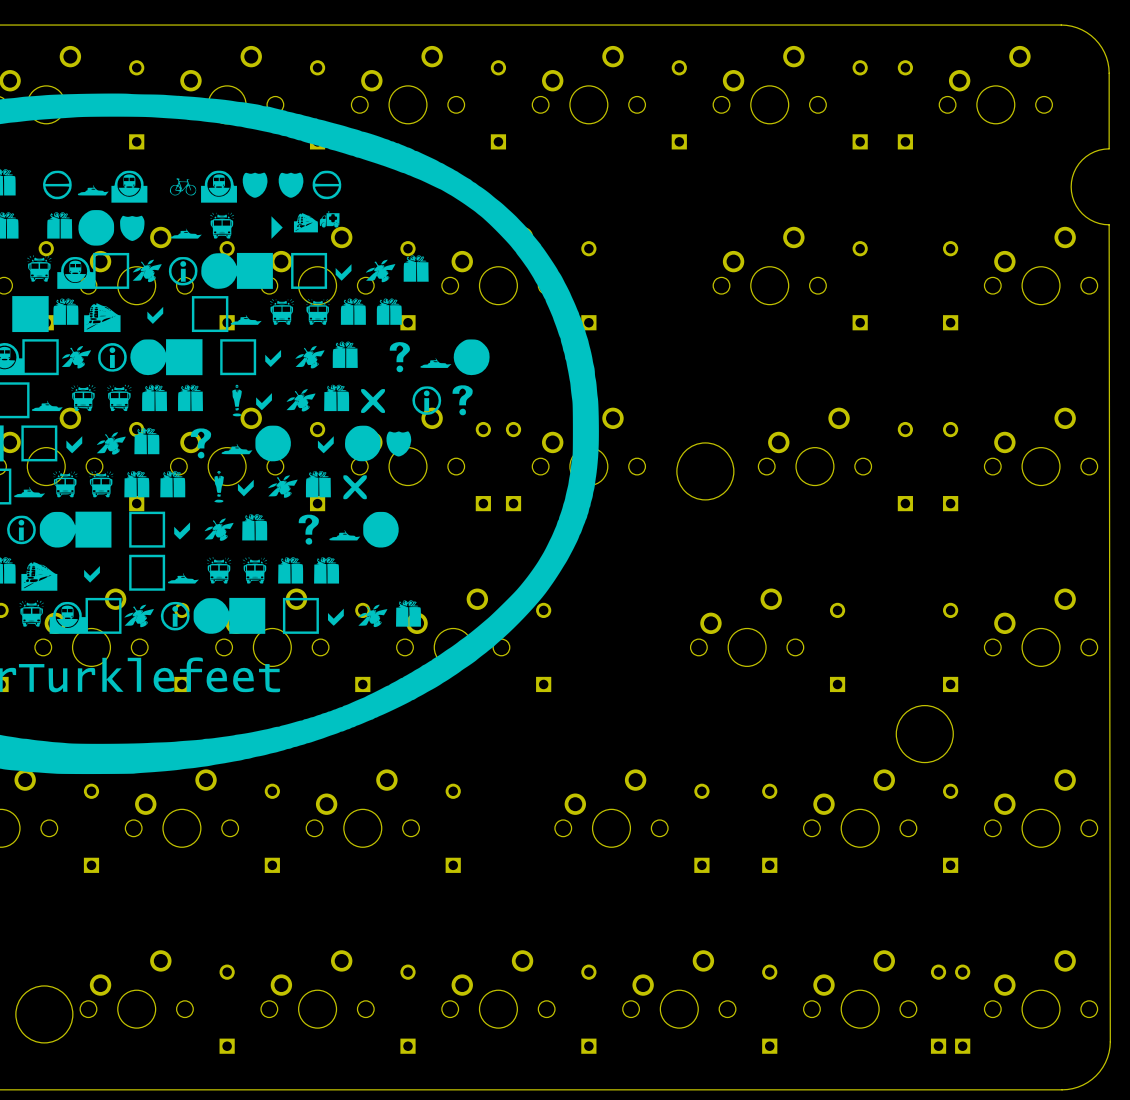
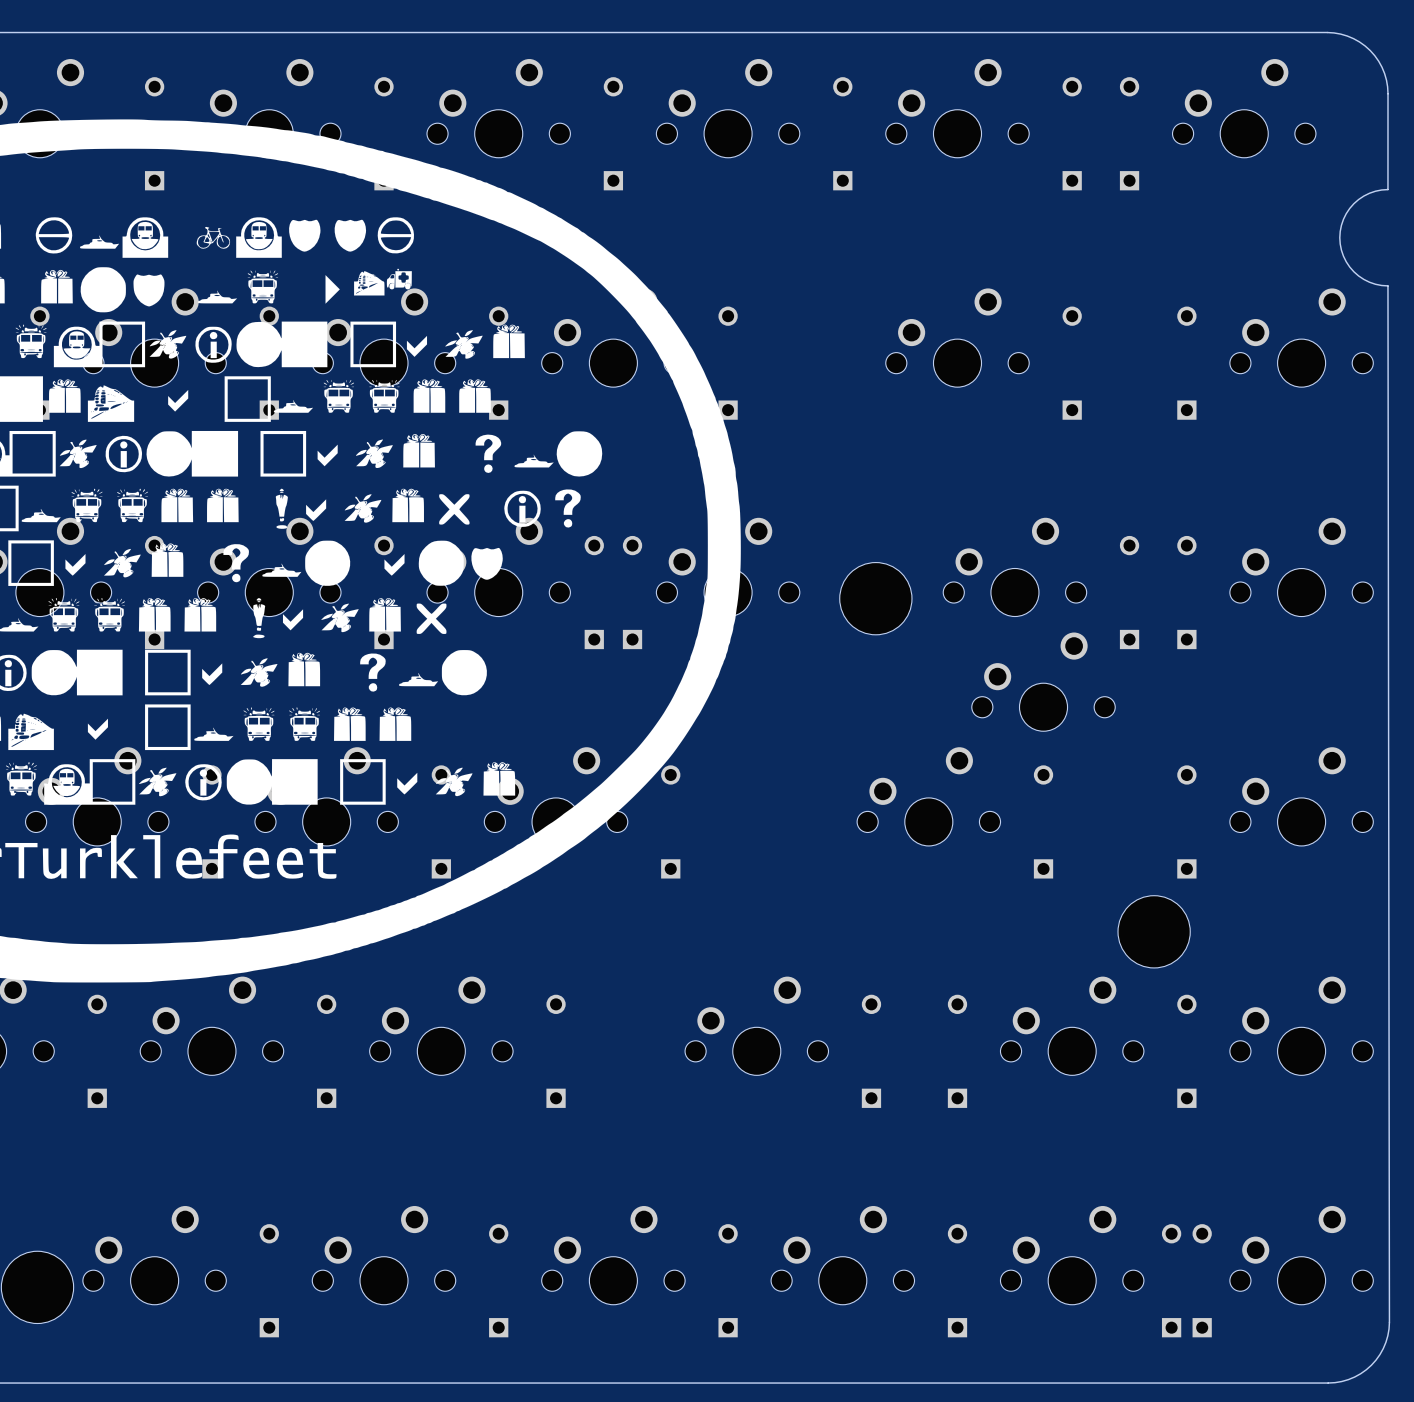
part: none -> (1029, 624)

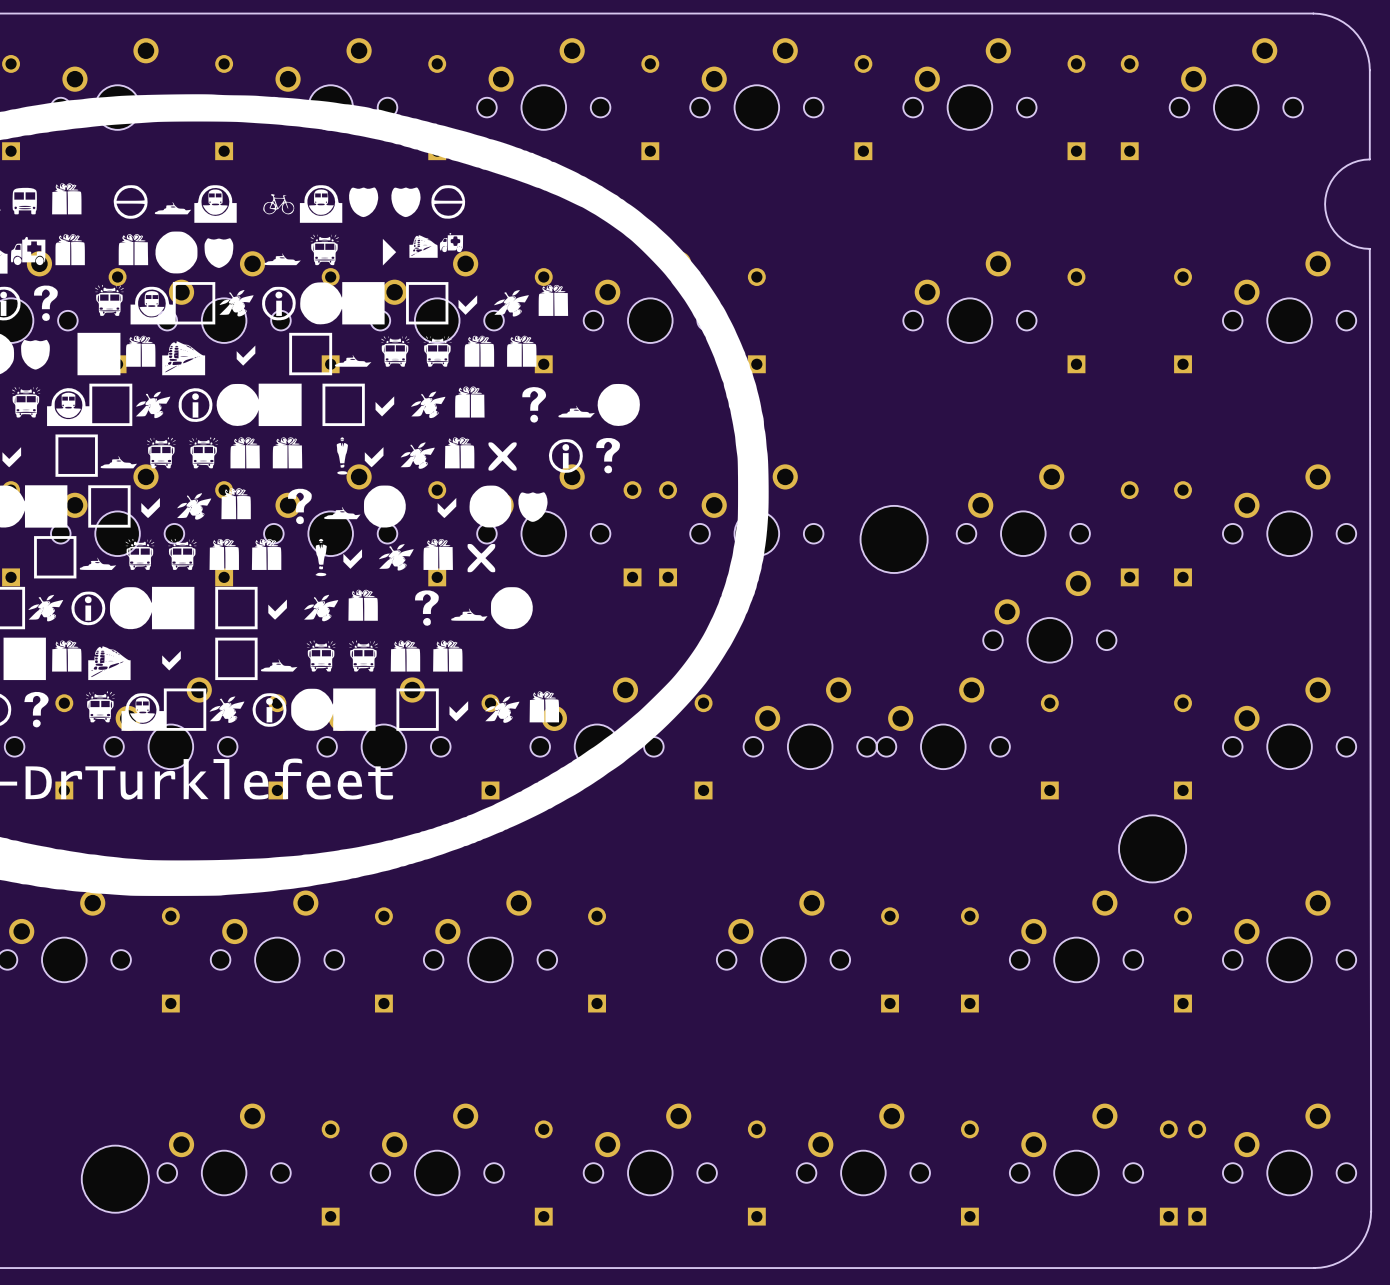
part: none -> (876, 723)
part: (928, 796) -> none

